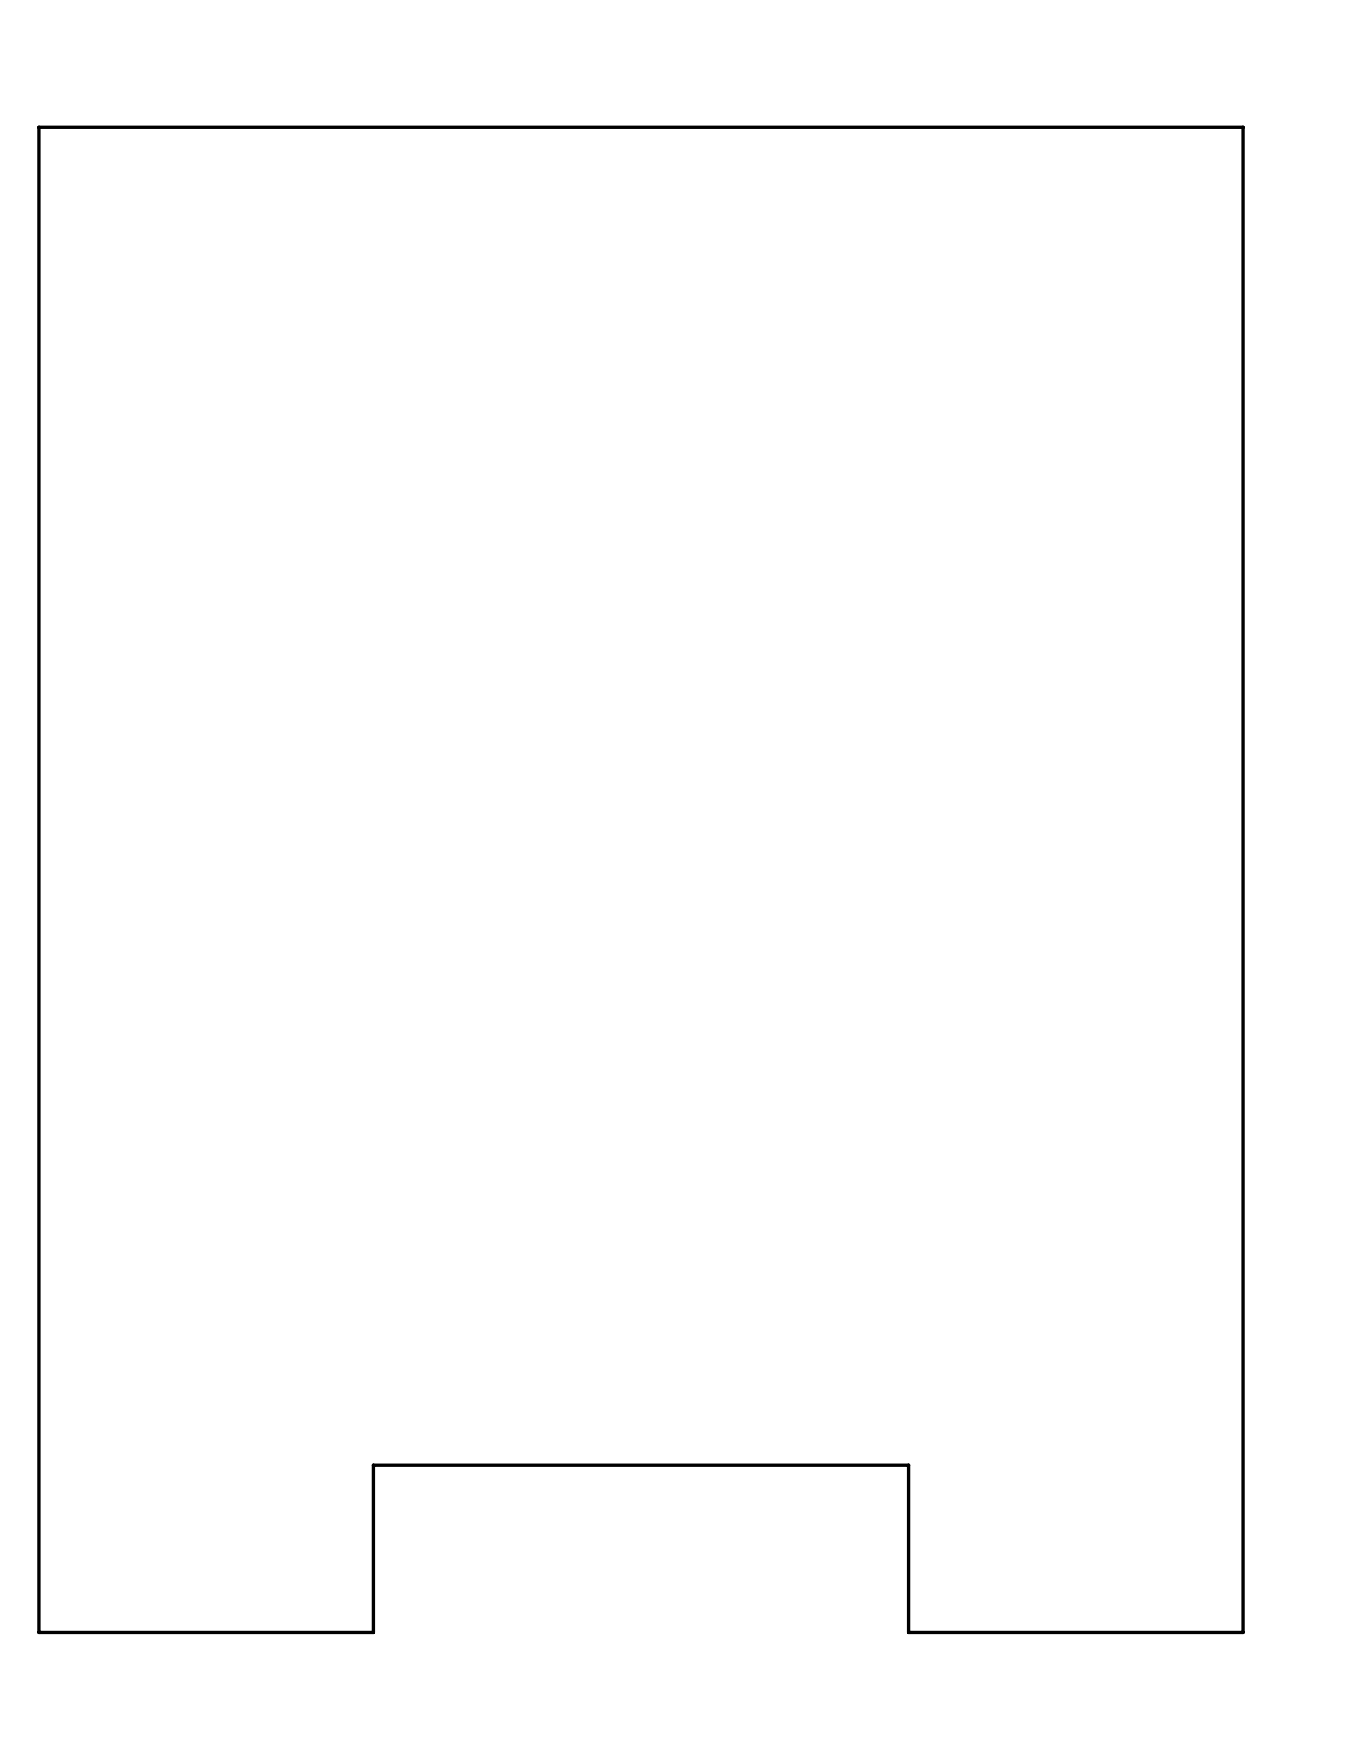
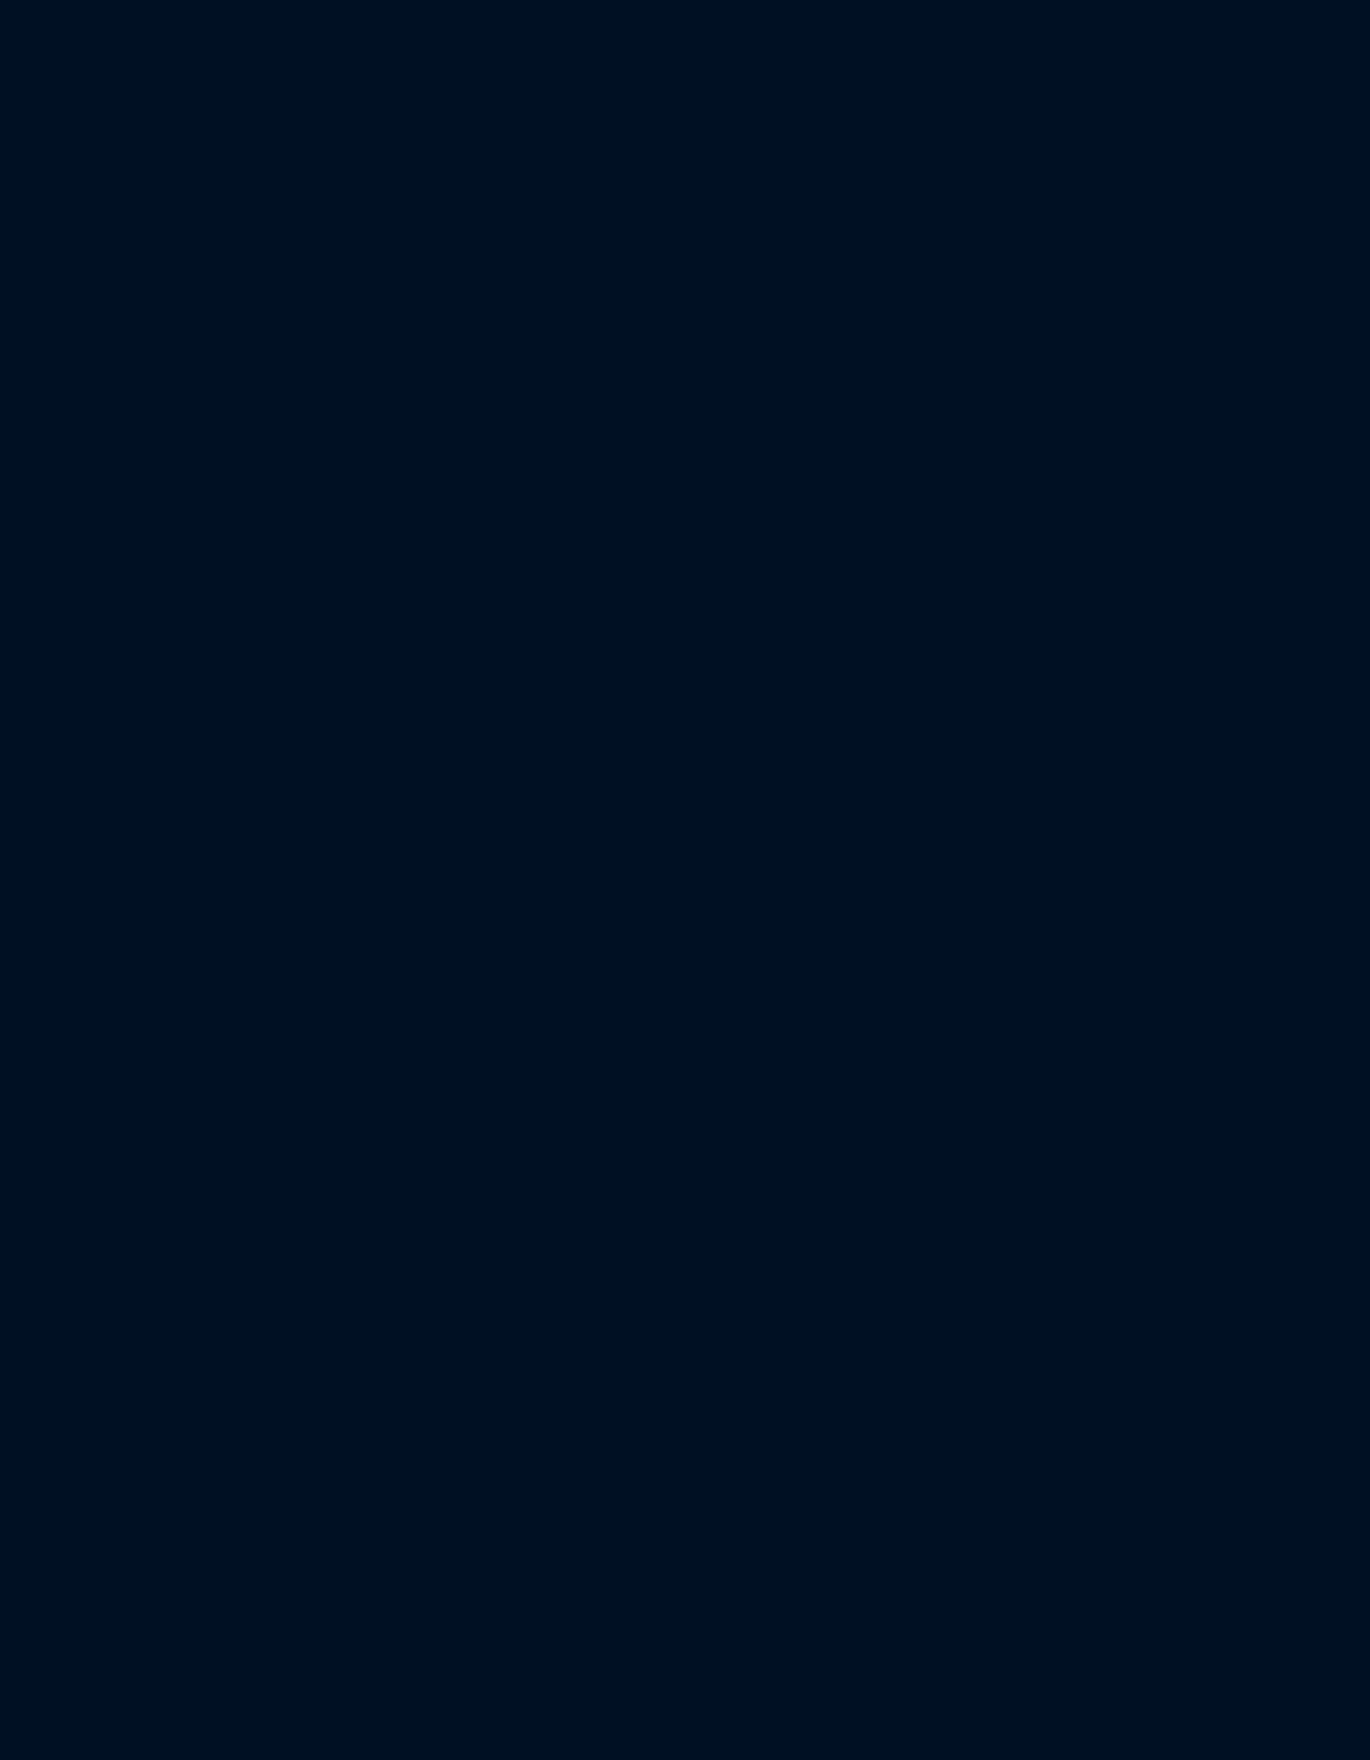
board edge: (38, 127) (1243, 127) (1243, 1632) (908, 1632) (908, 1465) (373, 1465) (373, 1632) (38, 1632) (38, 127) -> none

